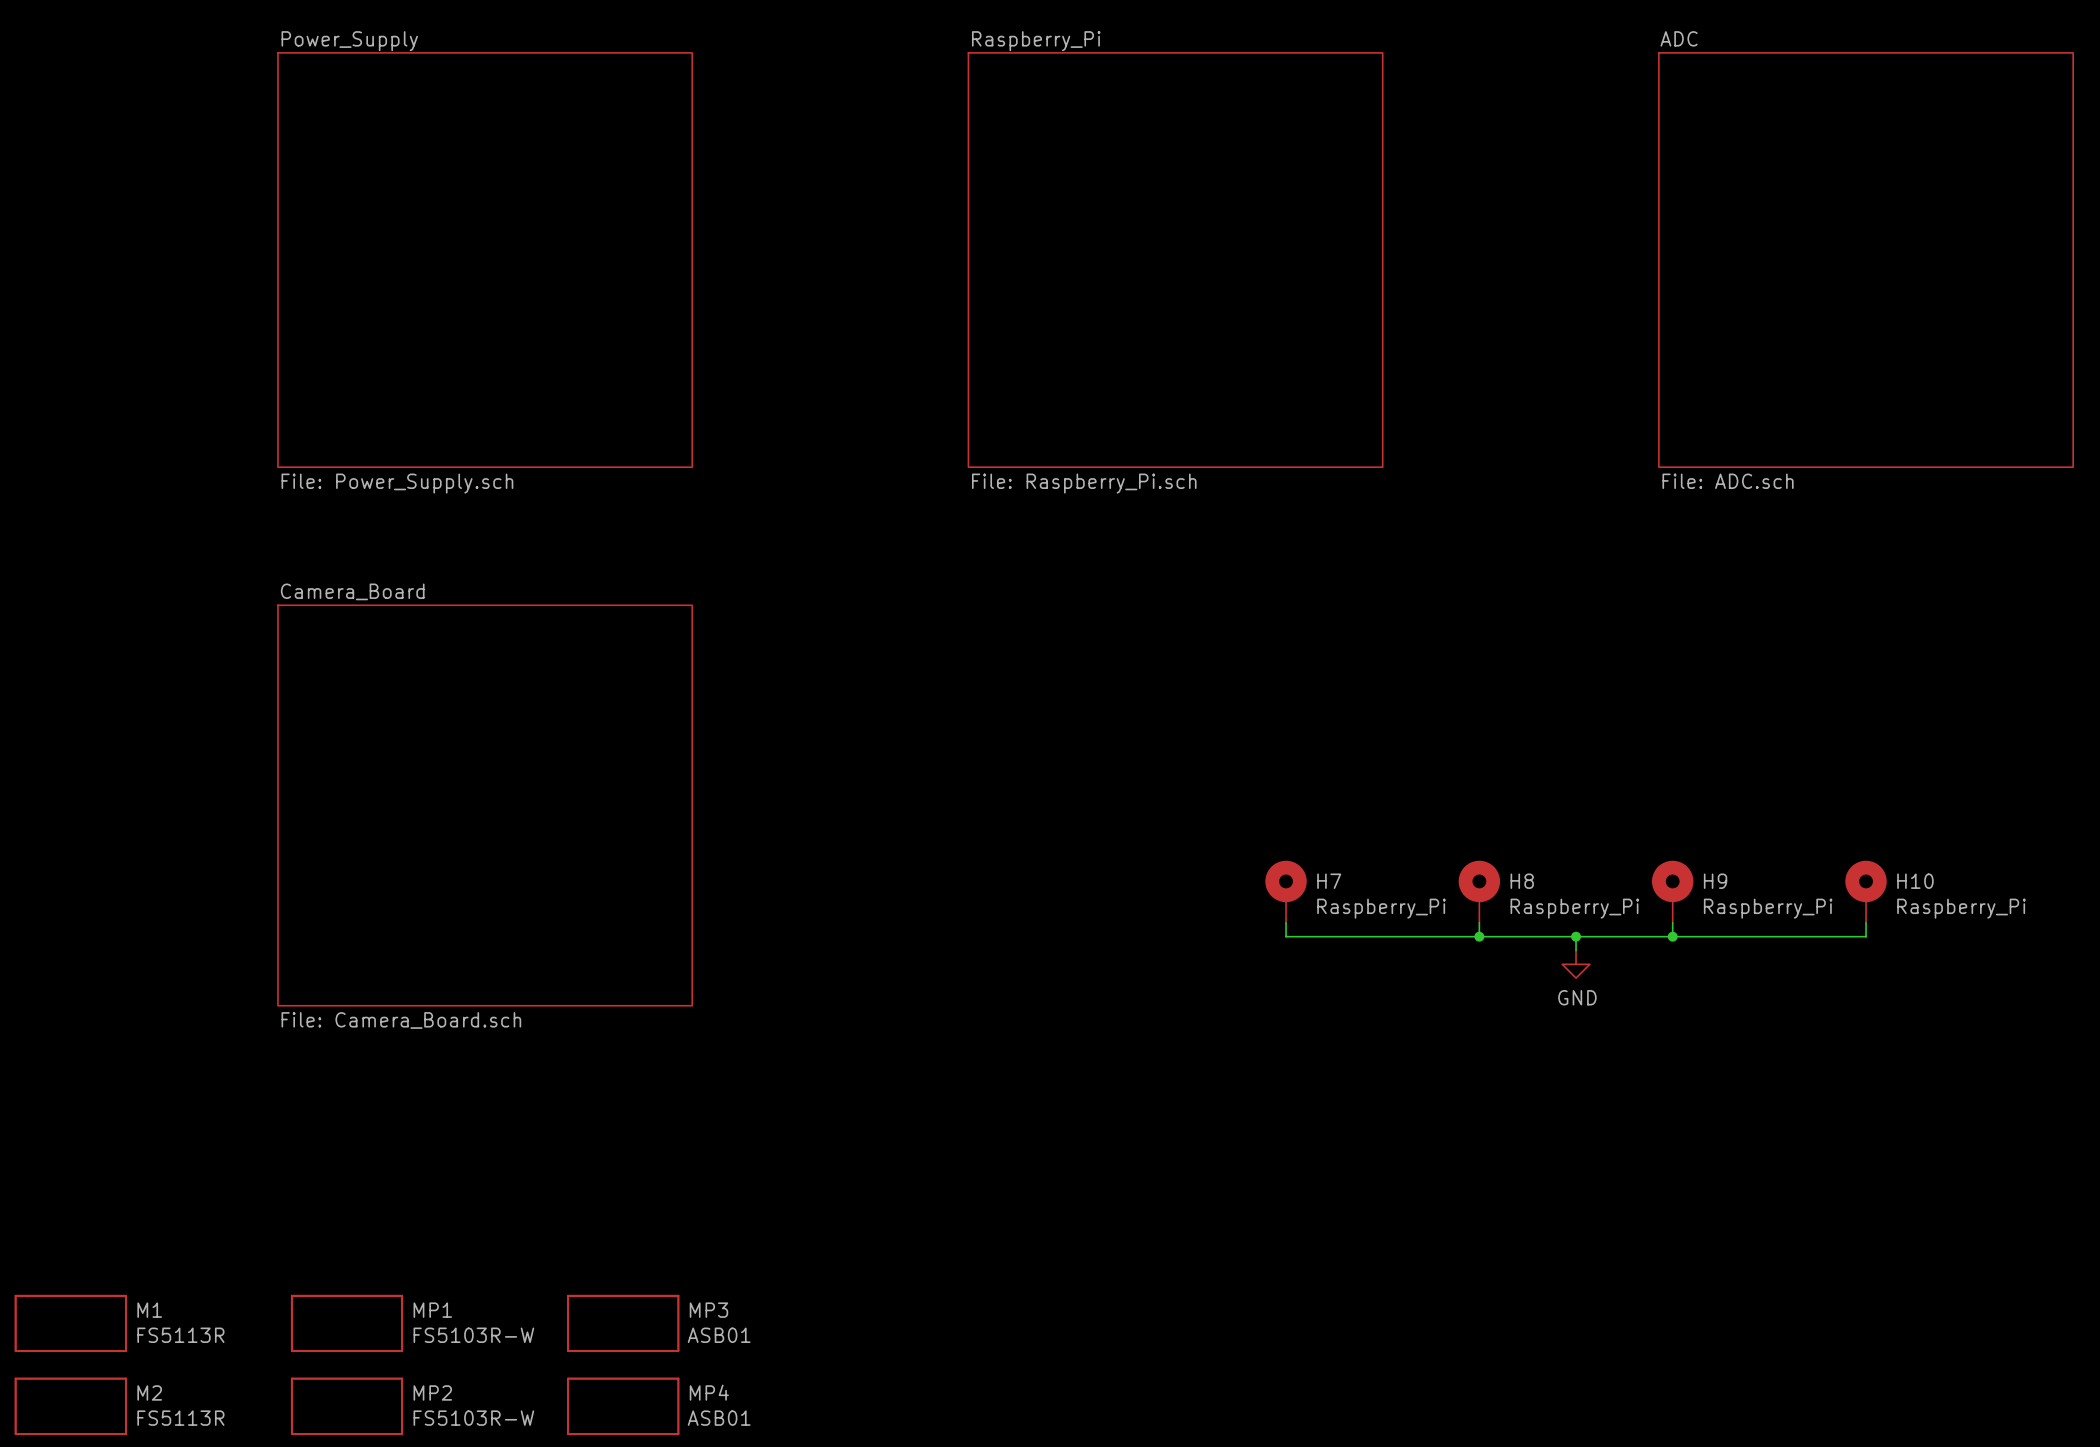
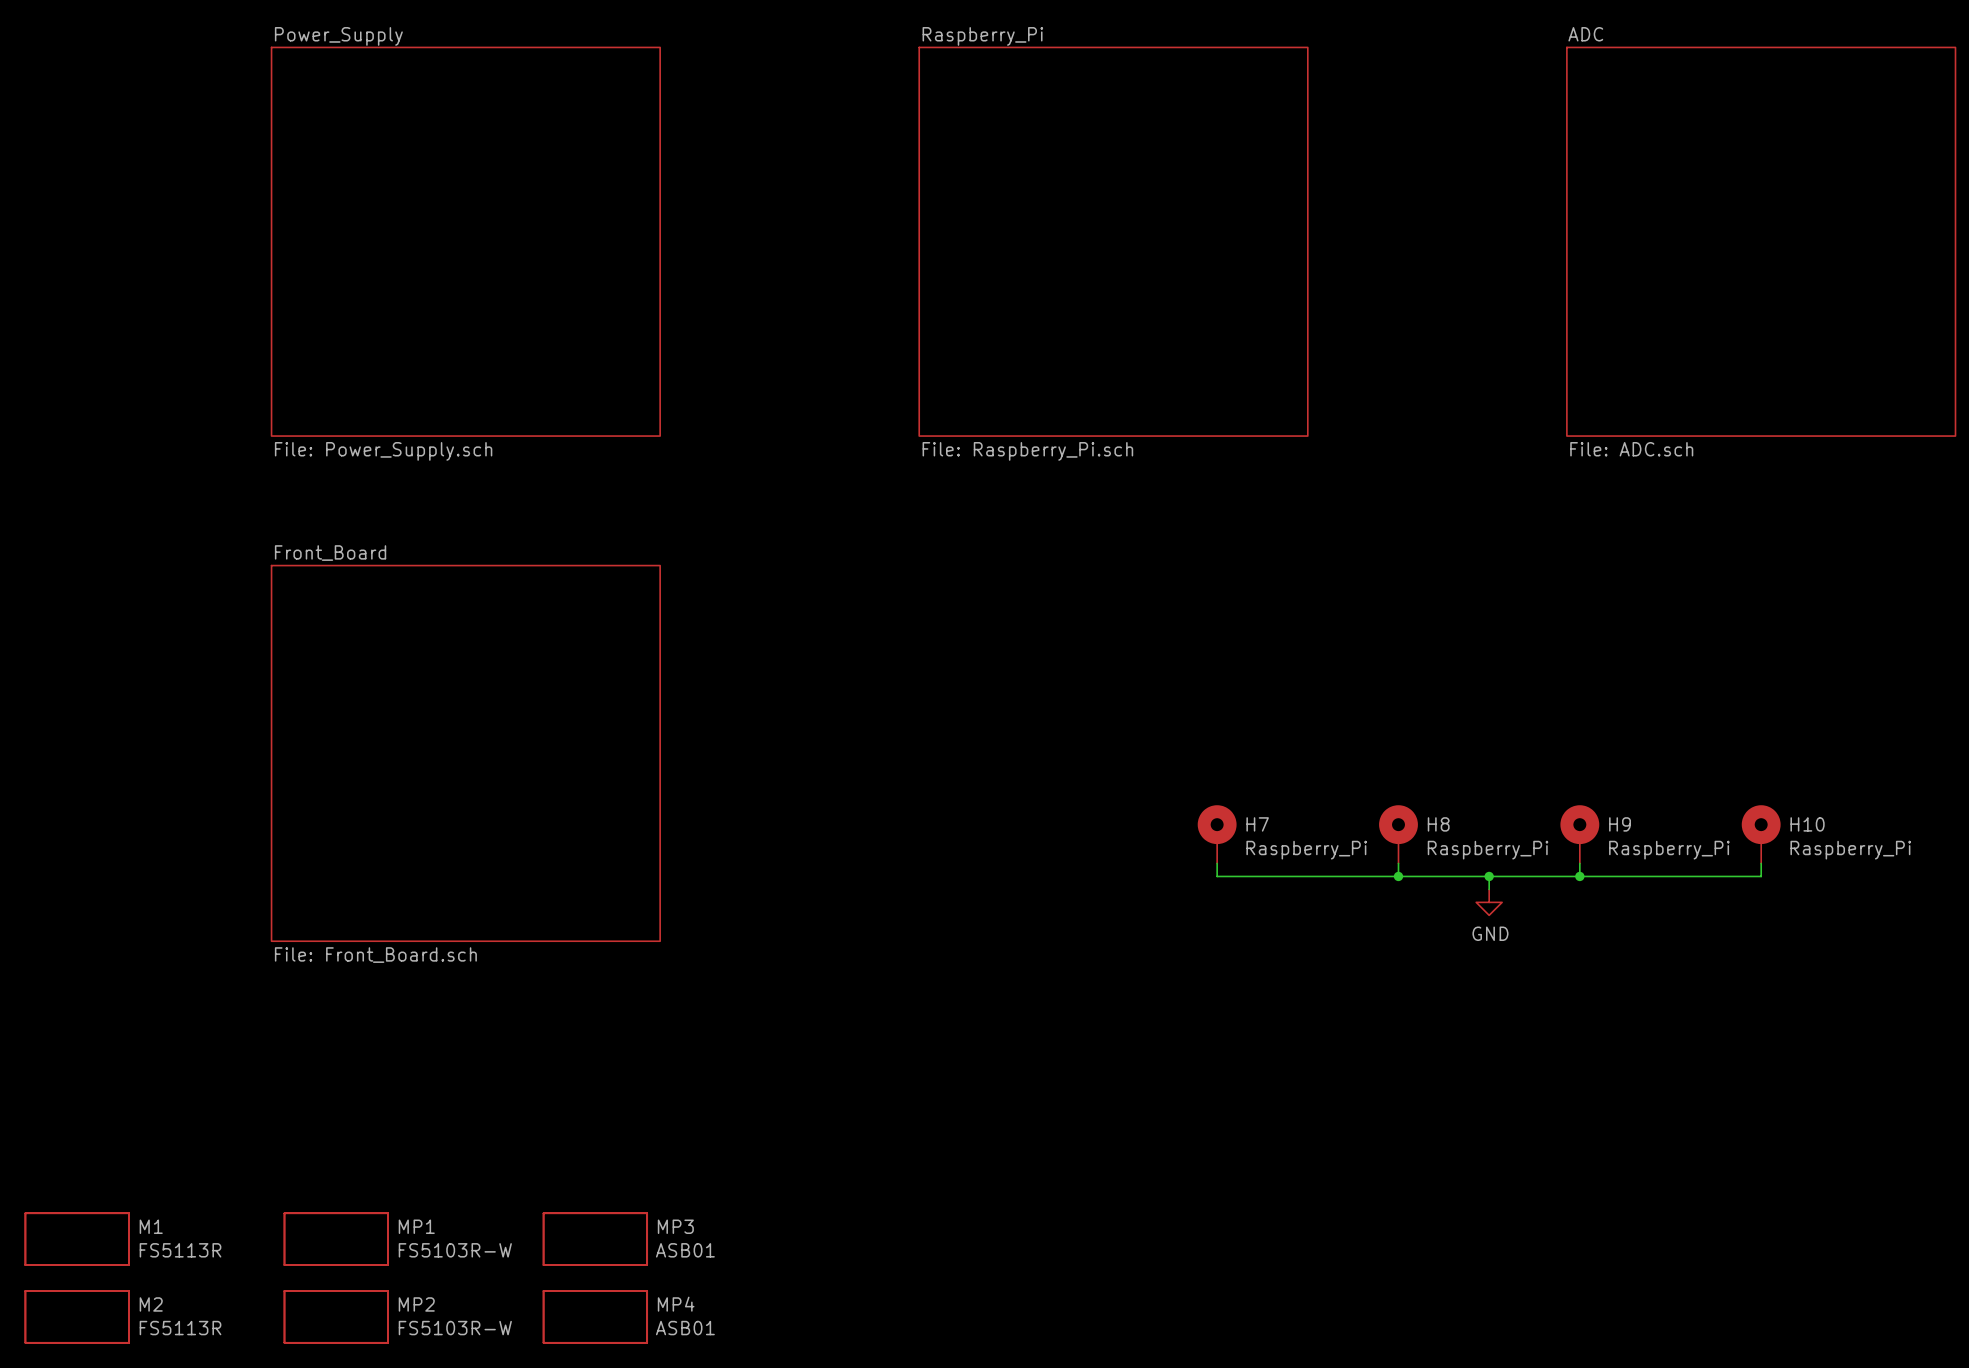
sheet Camera_Board name: Camera_Board (352, 591) -> Front_Board (330, 553)
sheet Camera_Board value: File: Camera_Board.sch (401, 1020) -> File: Front_Board.sch (375, 955)

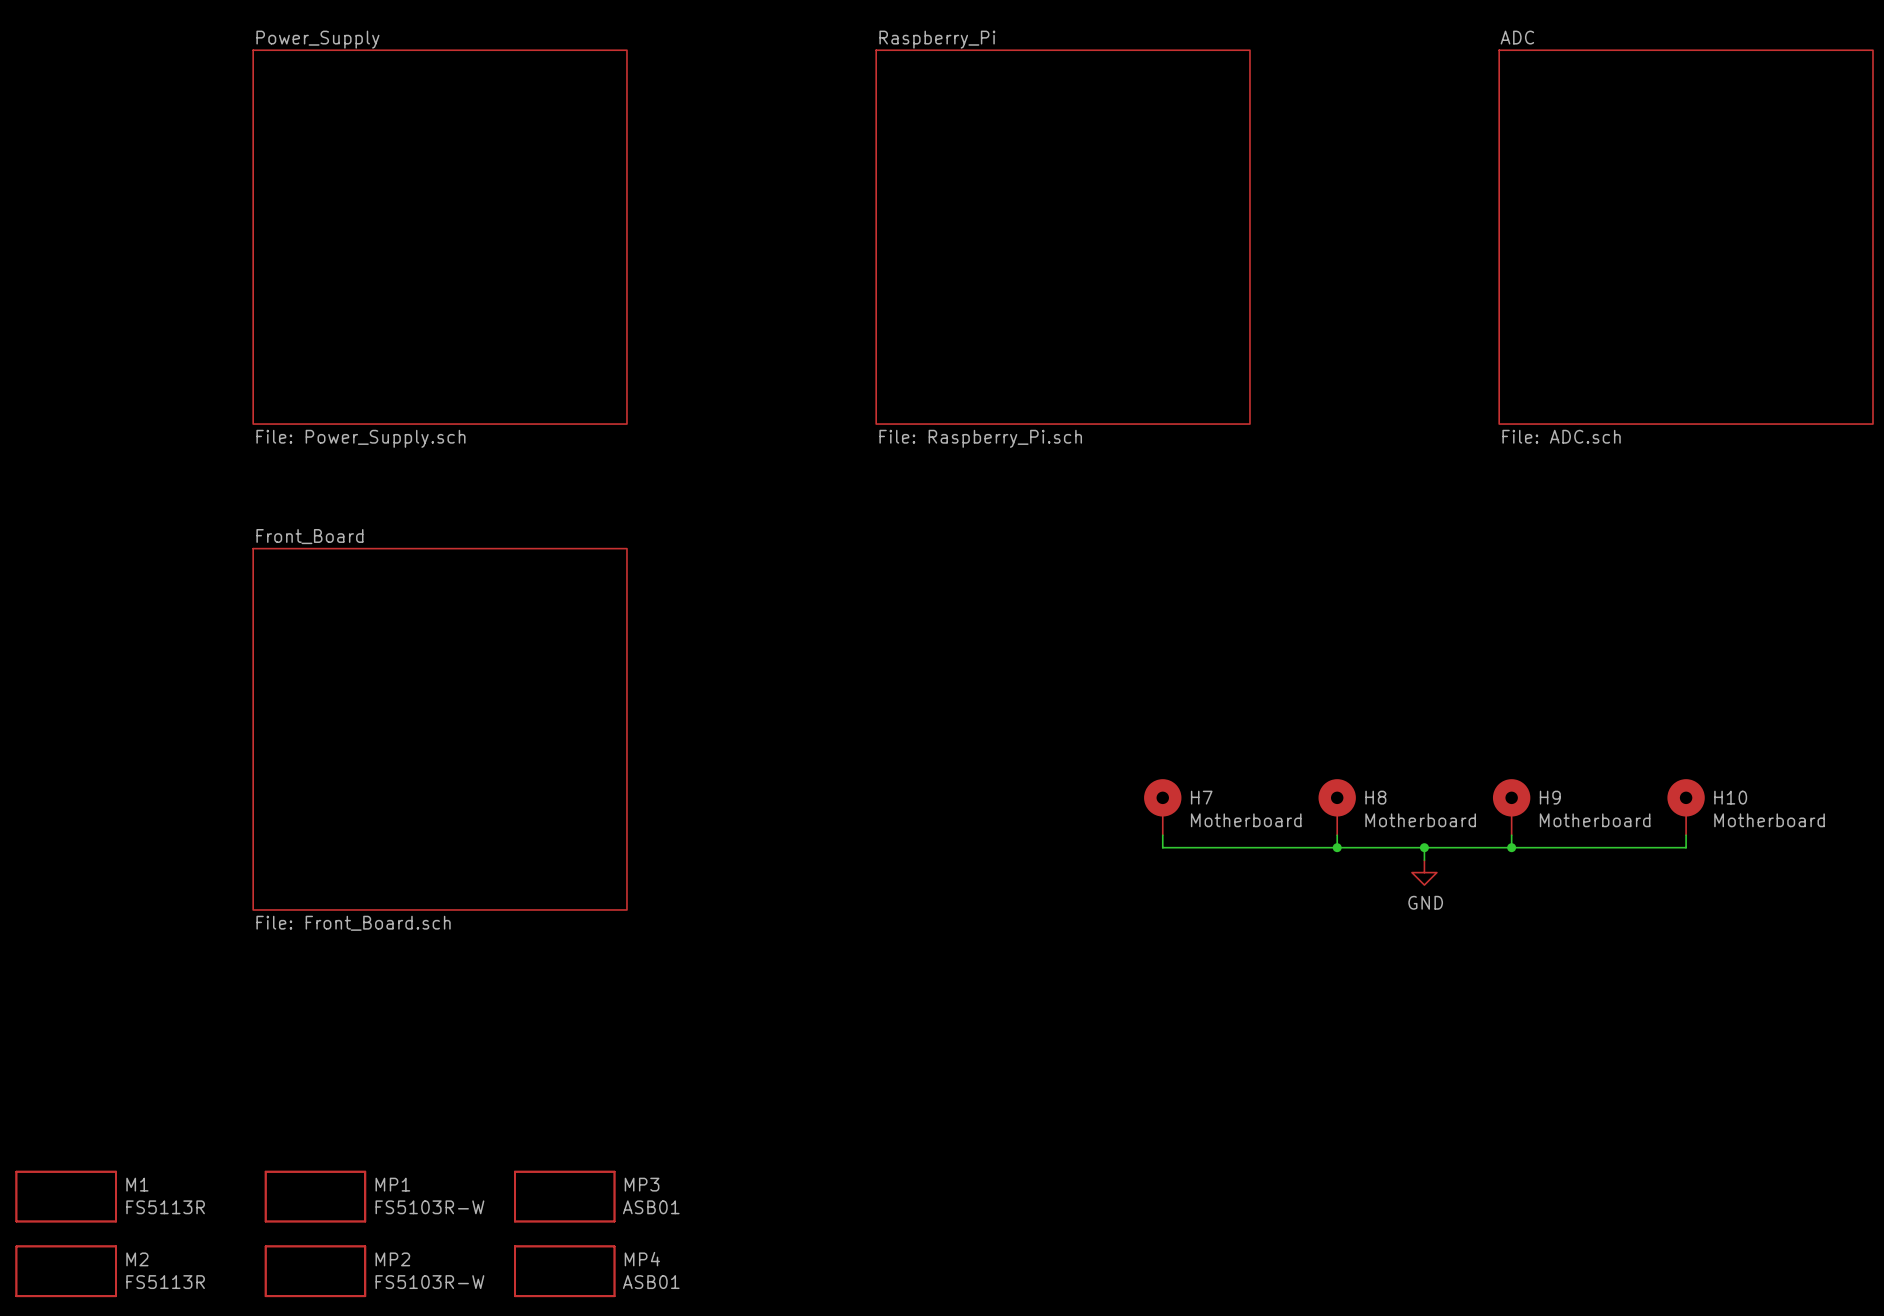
H7 value: Raspberry_Pi (1306, 850) -> Motherboard (1246, 820)
H8 value: Raspberry_Pi (1488, 850) -> Motherboard (1420, 820)
H9 value: Raspberry_Pi (1669, 850) -> Motherboard (1595, 820)
H10 value: Raspberry_Pi (1850, 850) -> Motherboard (1769, 820)

